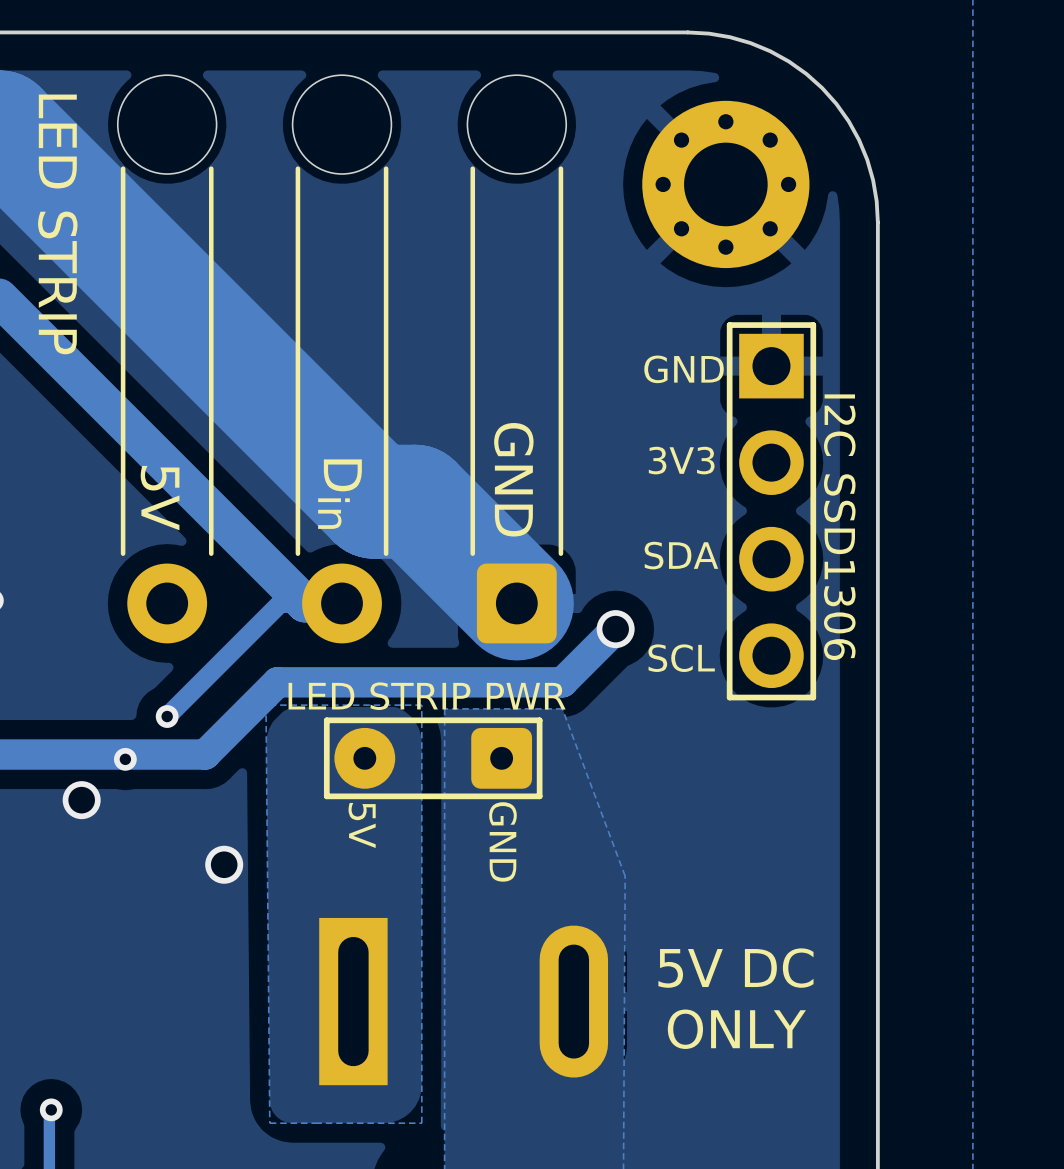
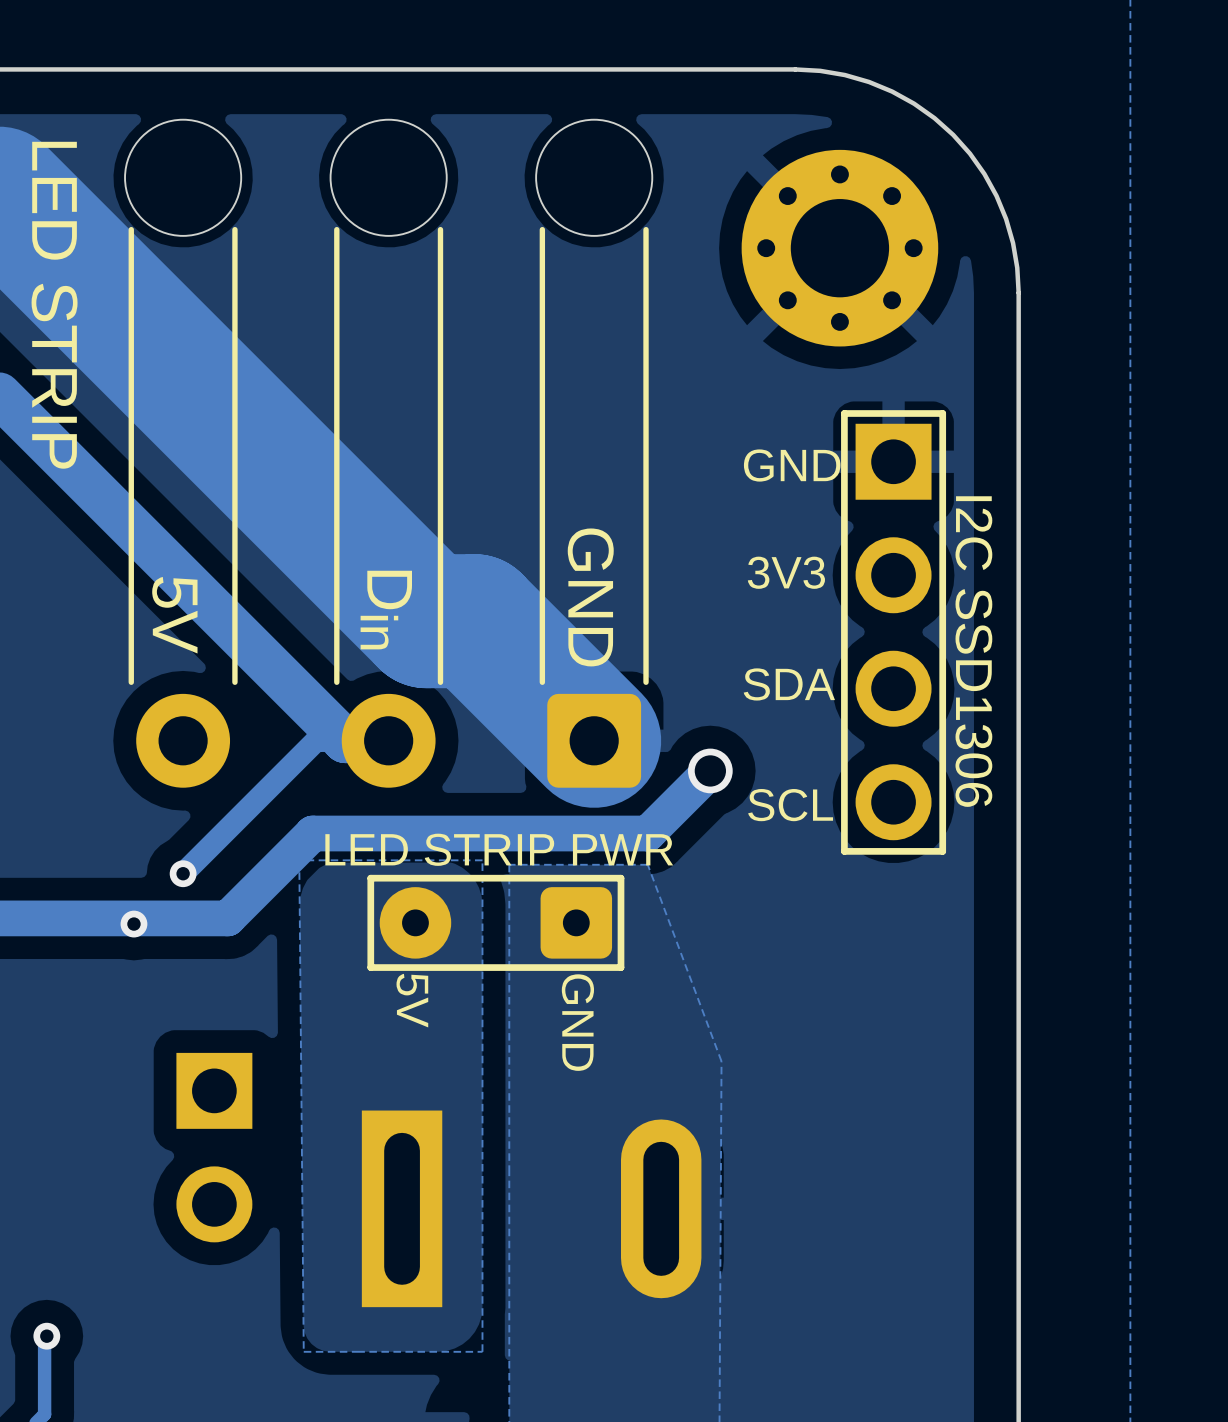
via: (81, 800) -> none
via: (224, 864) -> none
part: none -> (214, 1147)
text: 5V DC (735, 968) -> none
text: ONLY (736, 1029) -> none

